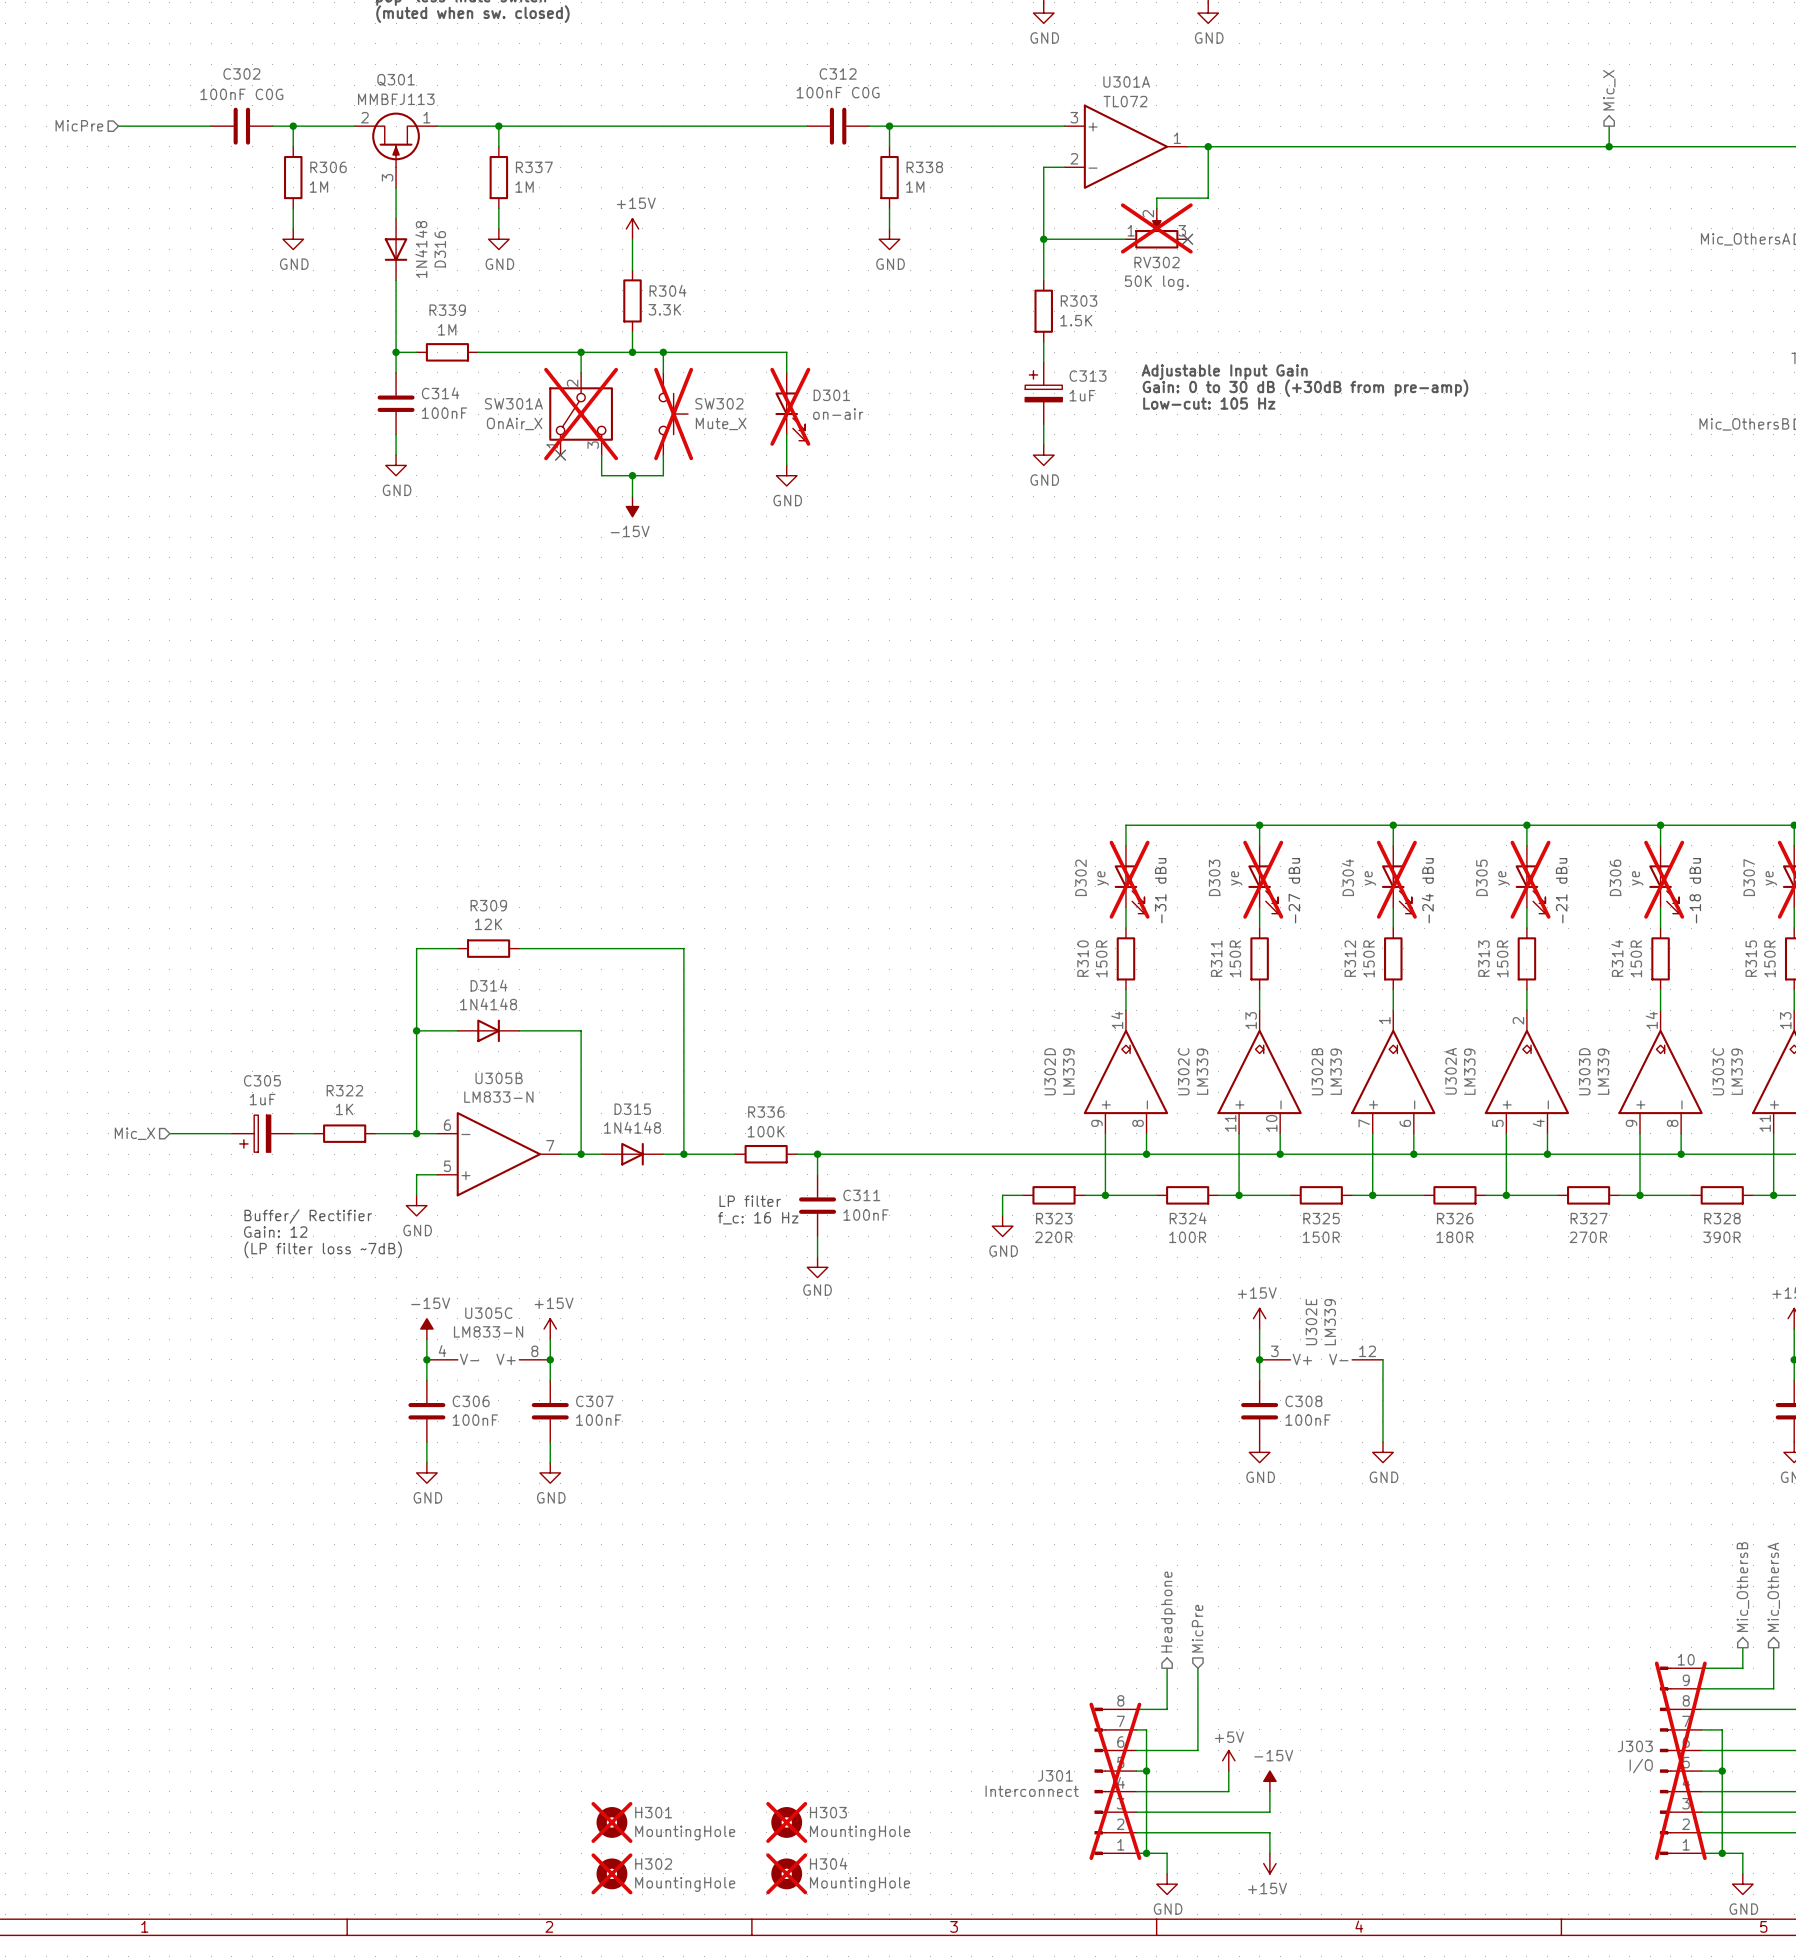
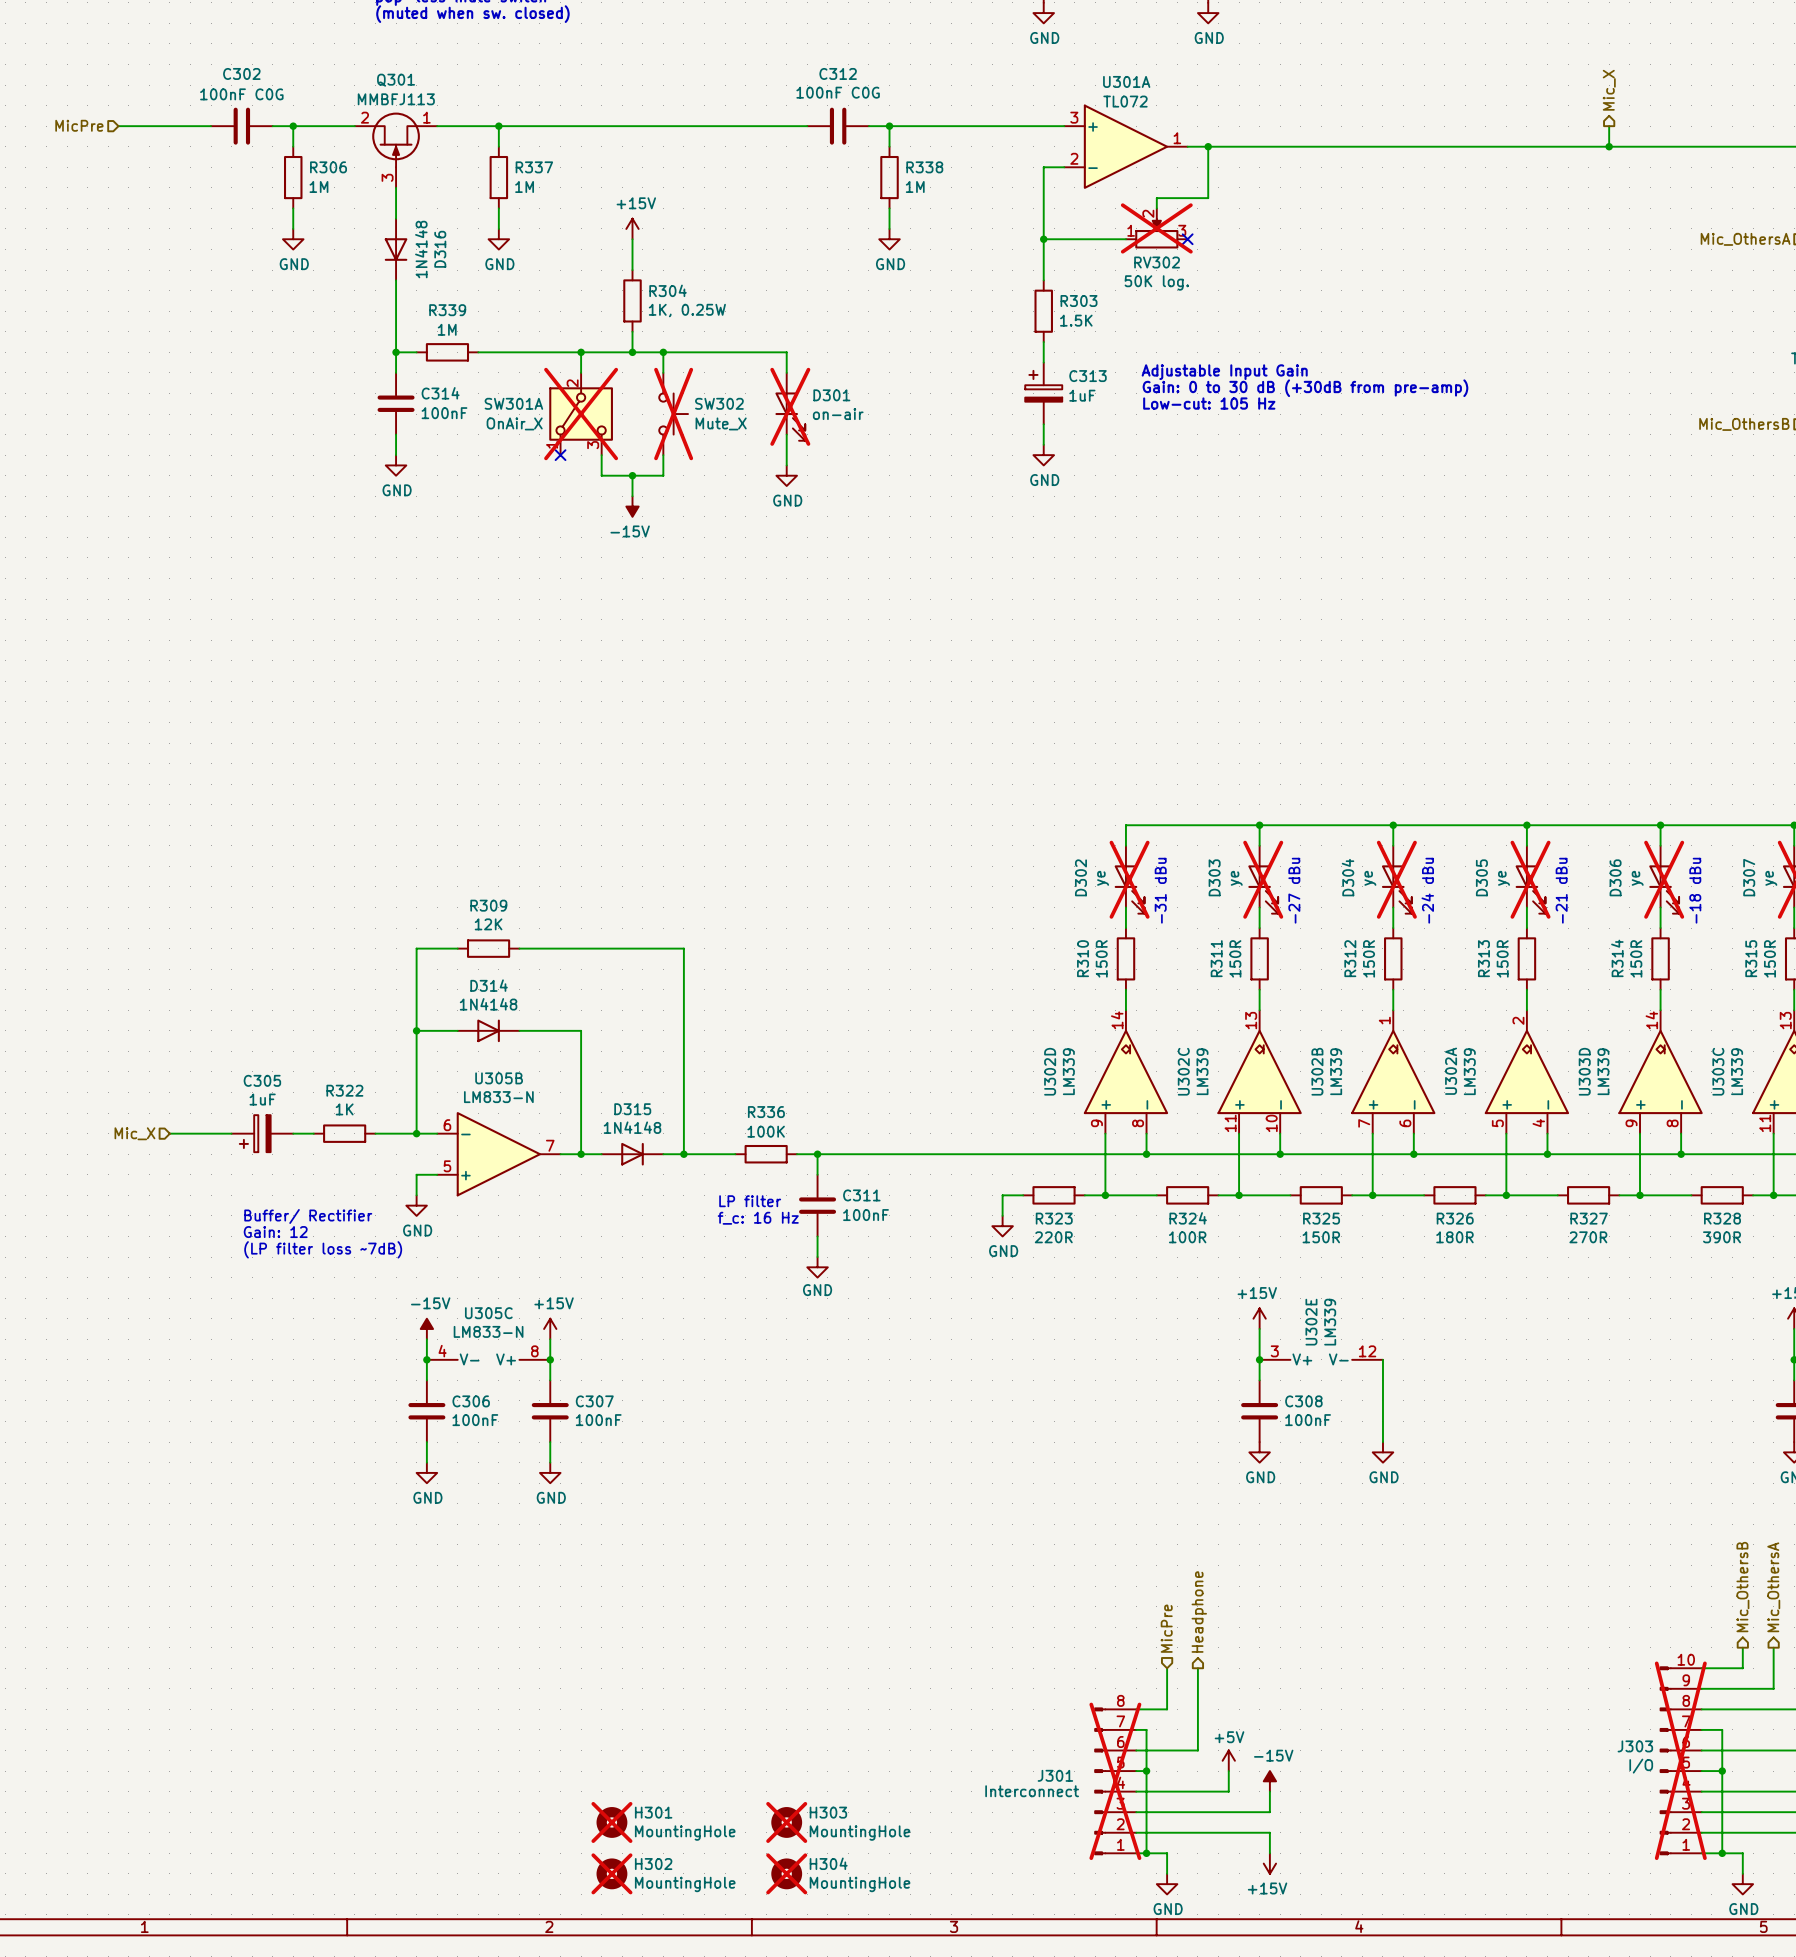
R304 value: 3.3K (664, 309) -> 1K, 0.25W (687, 310)
hierarchical label shape: output (1168, 1612) -> input (1166, 1628)
hierarchical label: Headphone (1168, 1612) -> MicPre (1166, 1628)
hierarchical label shape: input (1197, 1628) -> output (1199, 1612)
hierarchical label: MicPre (1197, 1628) -> Headphone (1199, 1612)

